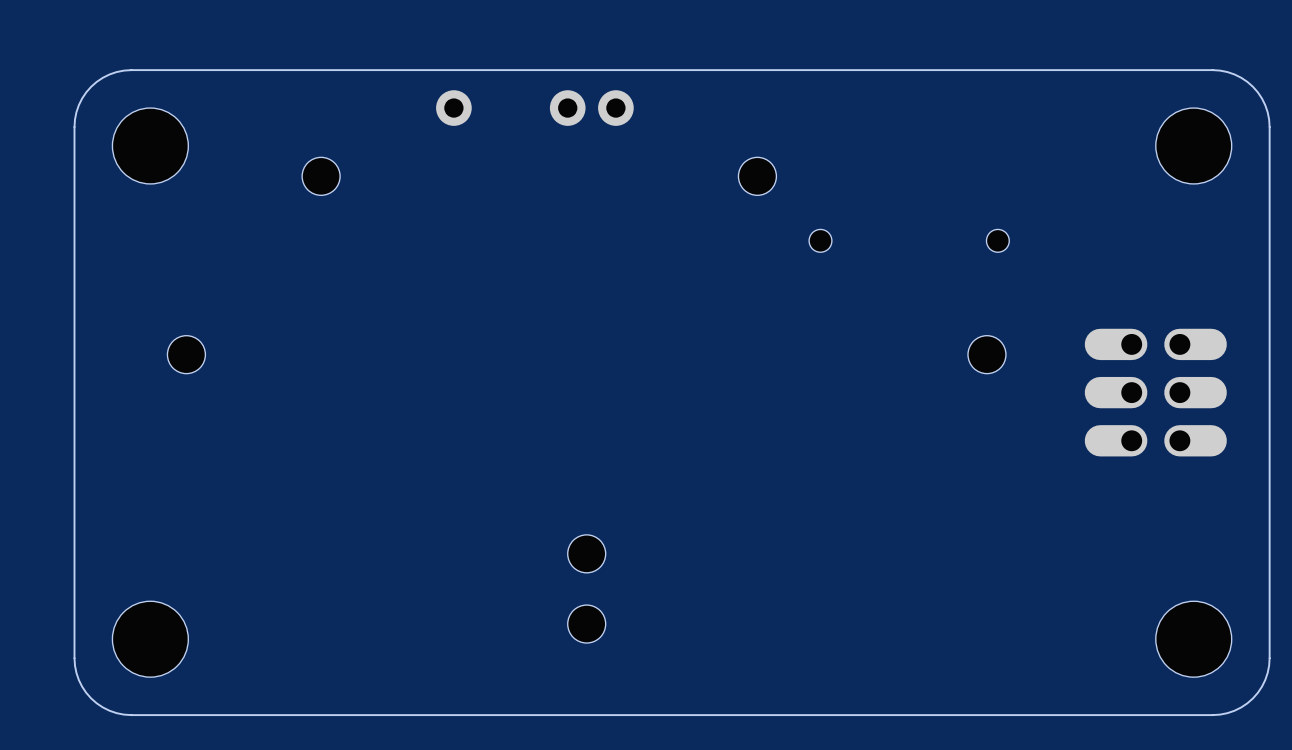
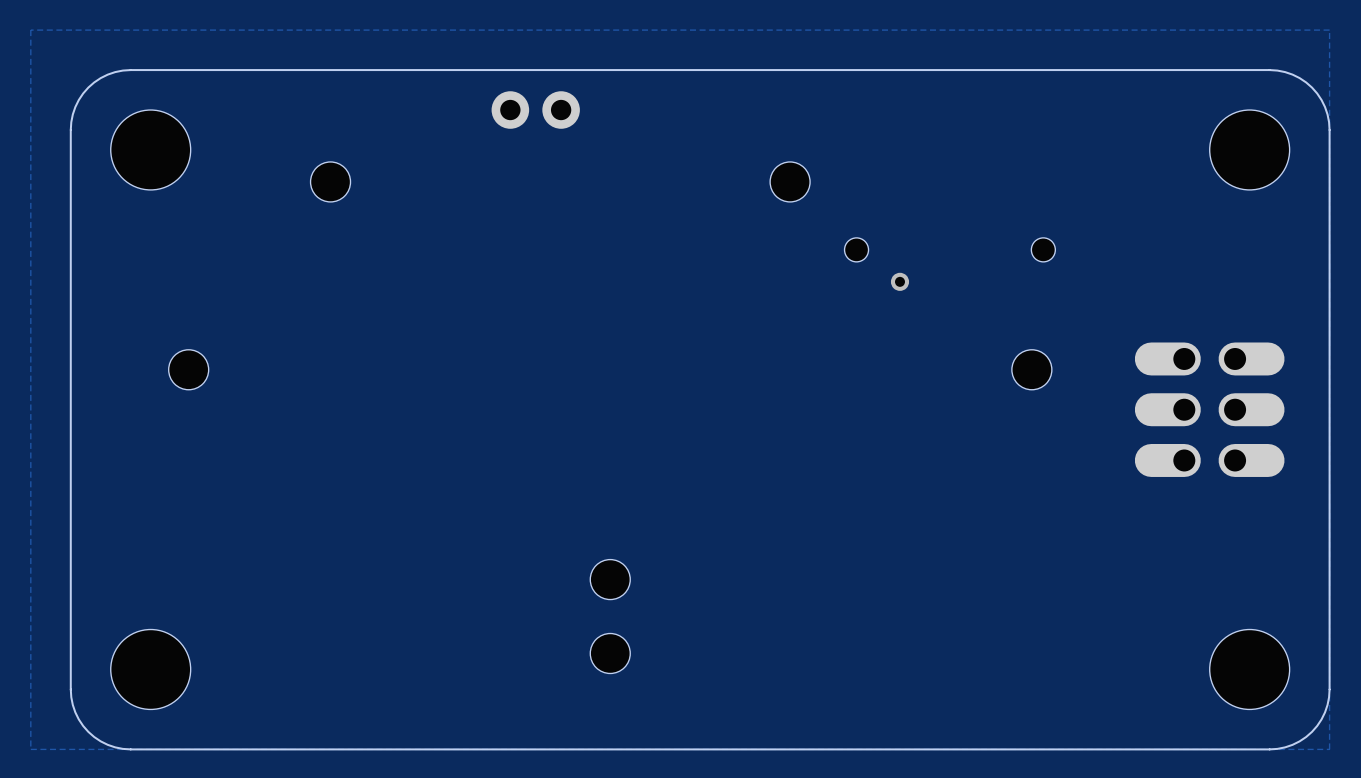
zone outline: none -> (1329, 30) (1329, 749) (30, 749) (30, 30) (1329, 30)
part: (453, 108) -> none
part position: (591, 108) -> (535, 110)
via: none -> (899, 281)

